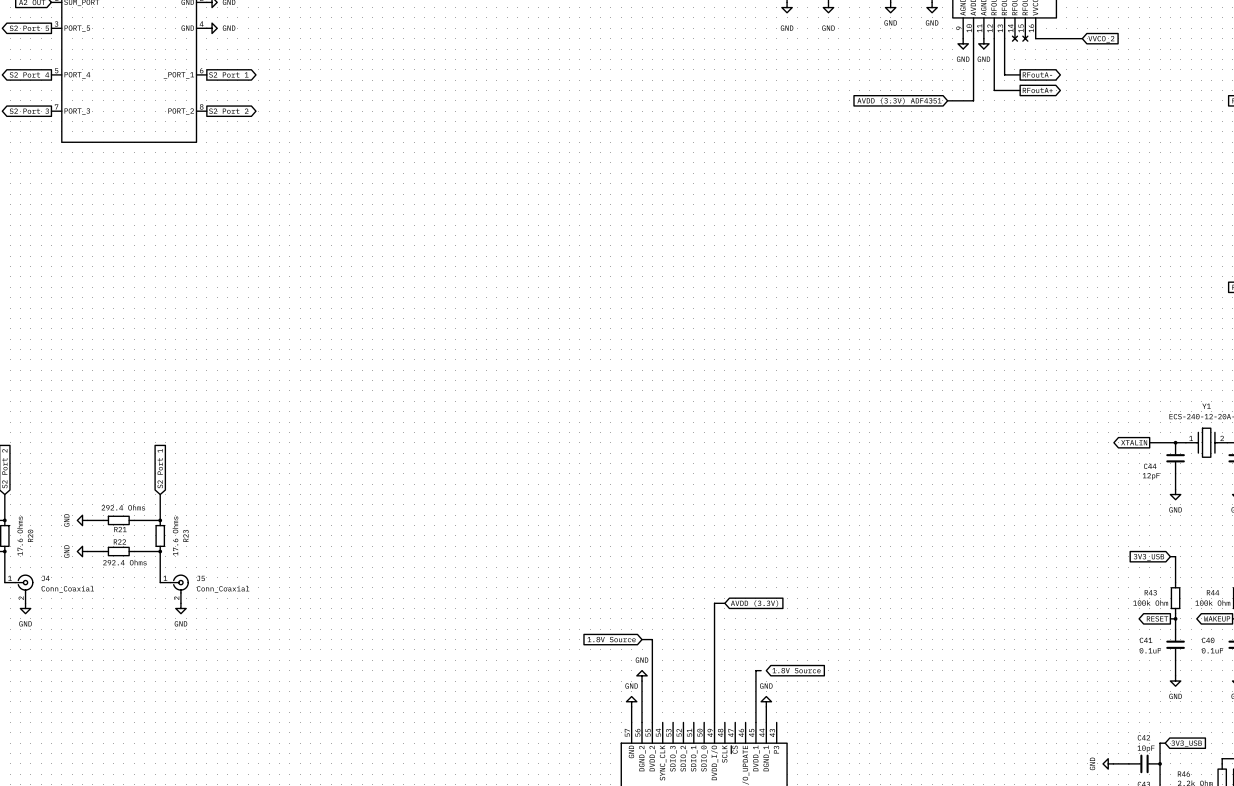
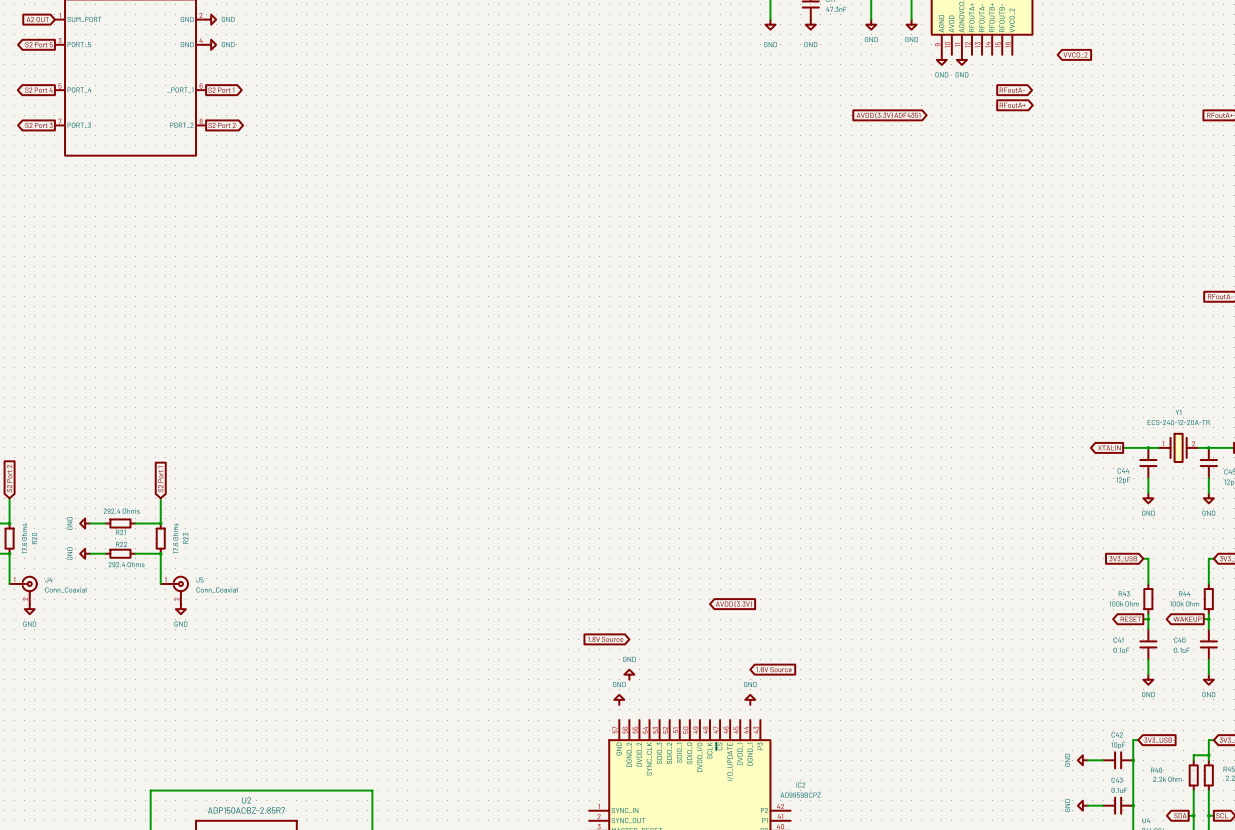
wire: (973, 38) (973, 100) (947, 100) -> none
wire: (994, 38) (994, 90) (1020, 90) -> none
wire: (1004, 38) (1004, 74) (1020, 74) -> none
no-connect mark: (1014, 38) -> none
no-connect mark: (1025, 38) -> none
wire: (1035, 38) (1082, 38) -> none
wire: (724, 603) (714, 603) (714, 722) -> none
wire: (642, 639) (652, 639) (652, 722) -> none
wire: (761, 670) (755, 670) (755, 722) -> none
wire: (642, 681) (642, 722) -> none
wire: (631, 706) (631, 722) -> none
wire: (766, 706) (766, 722) -> none

